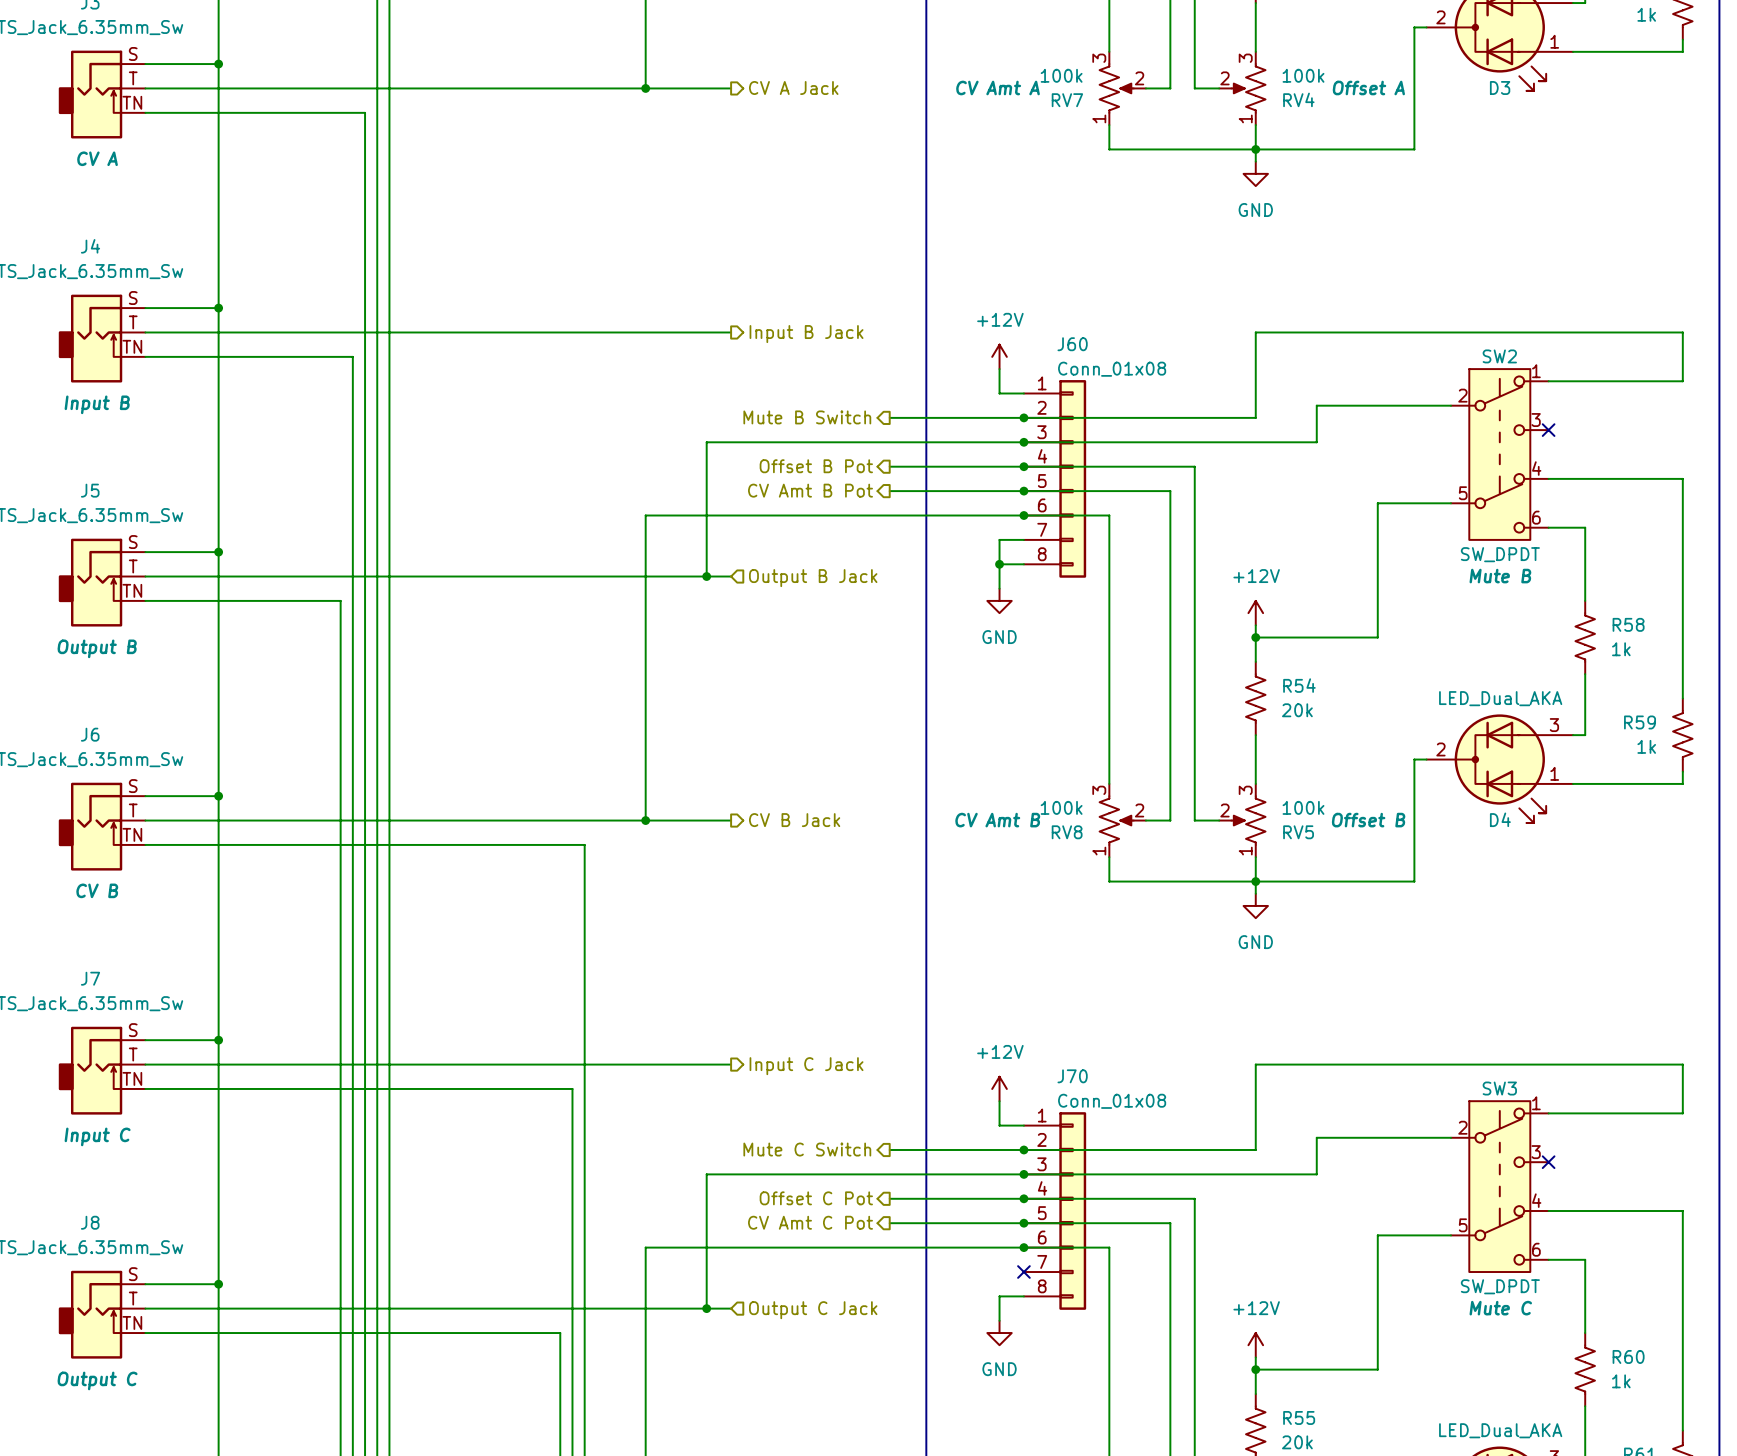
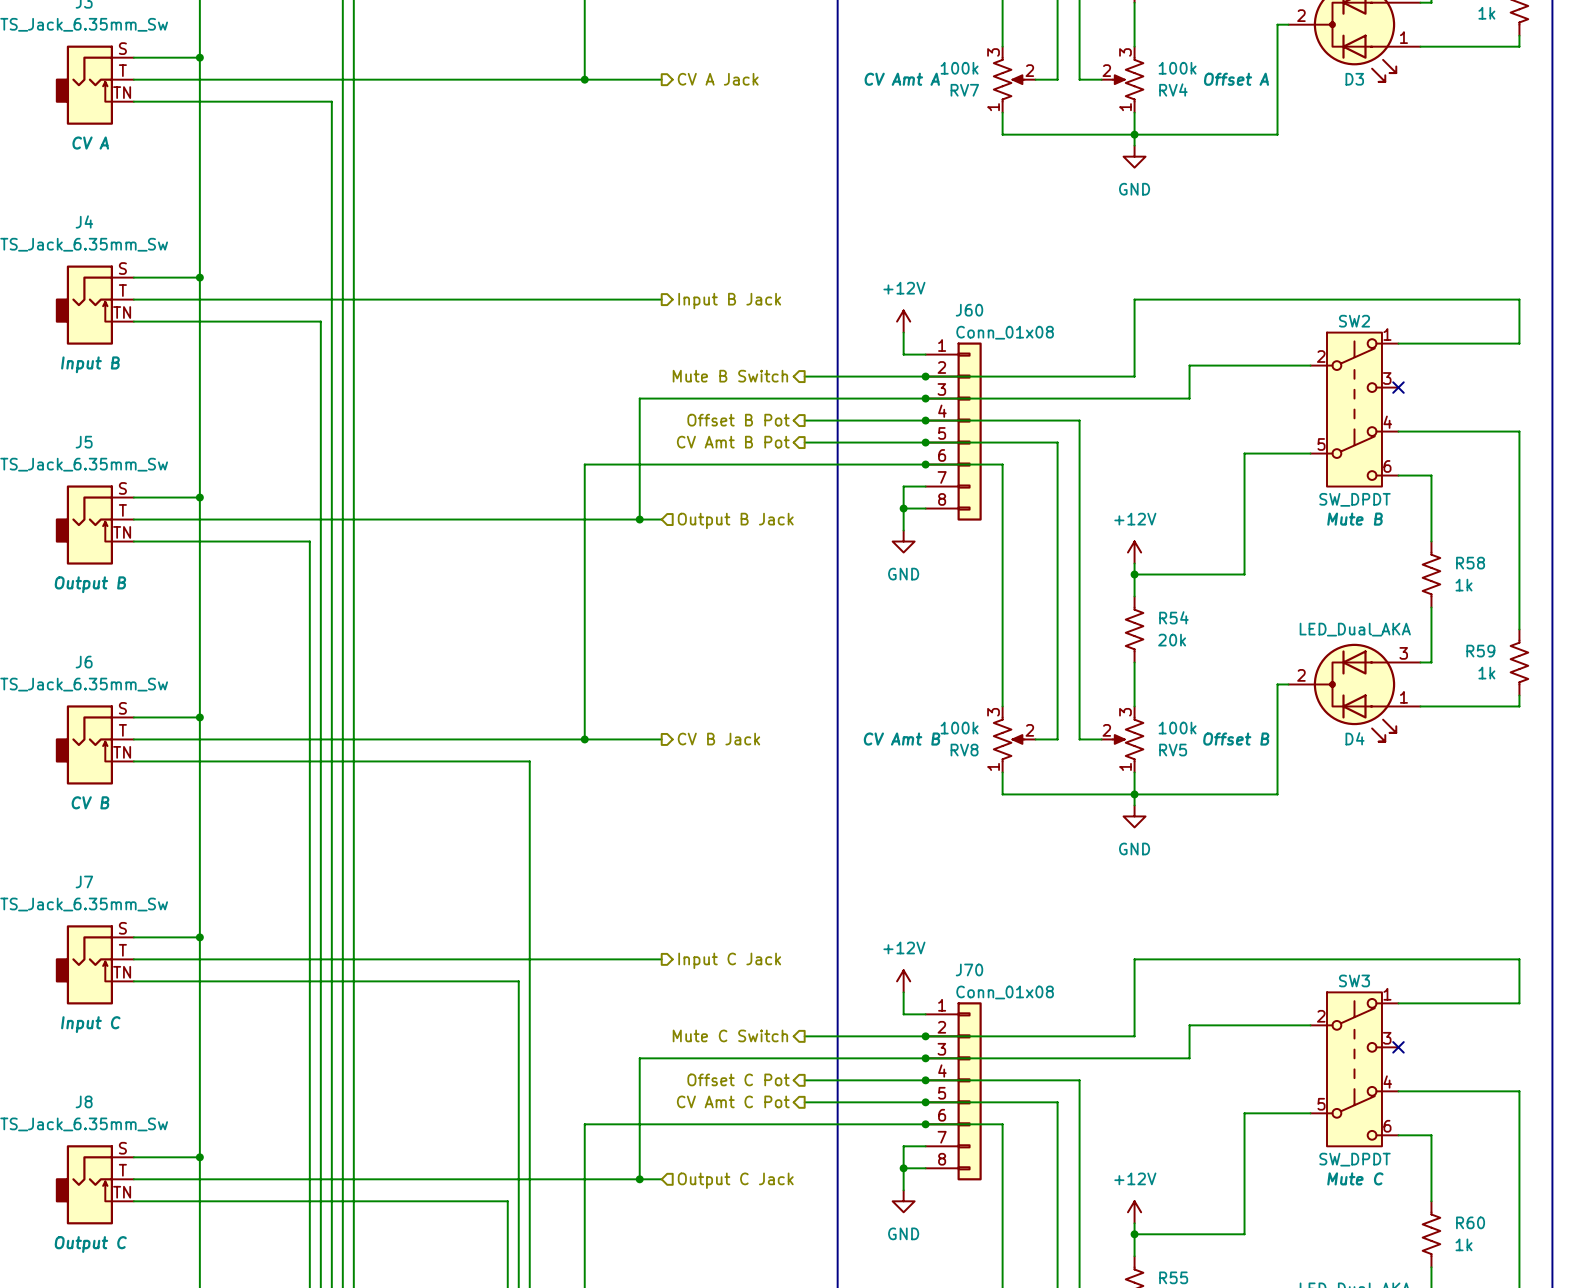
wire: none -> (925, 1146) (903, 1146) (903, 1168)
no-connect mark: (1023, 1272) -> none
junction: none -> (903, 1168)

